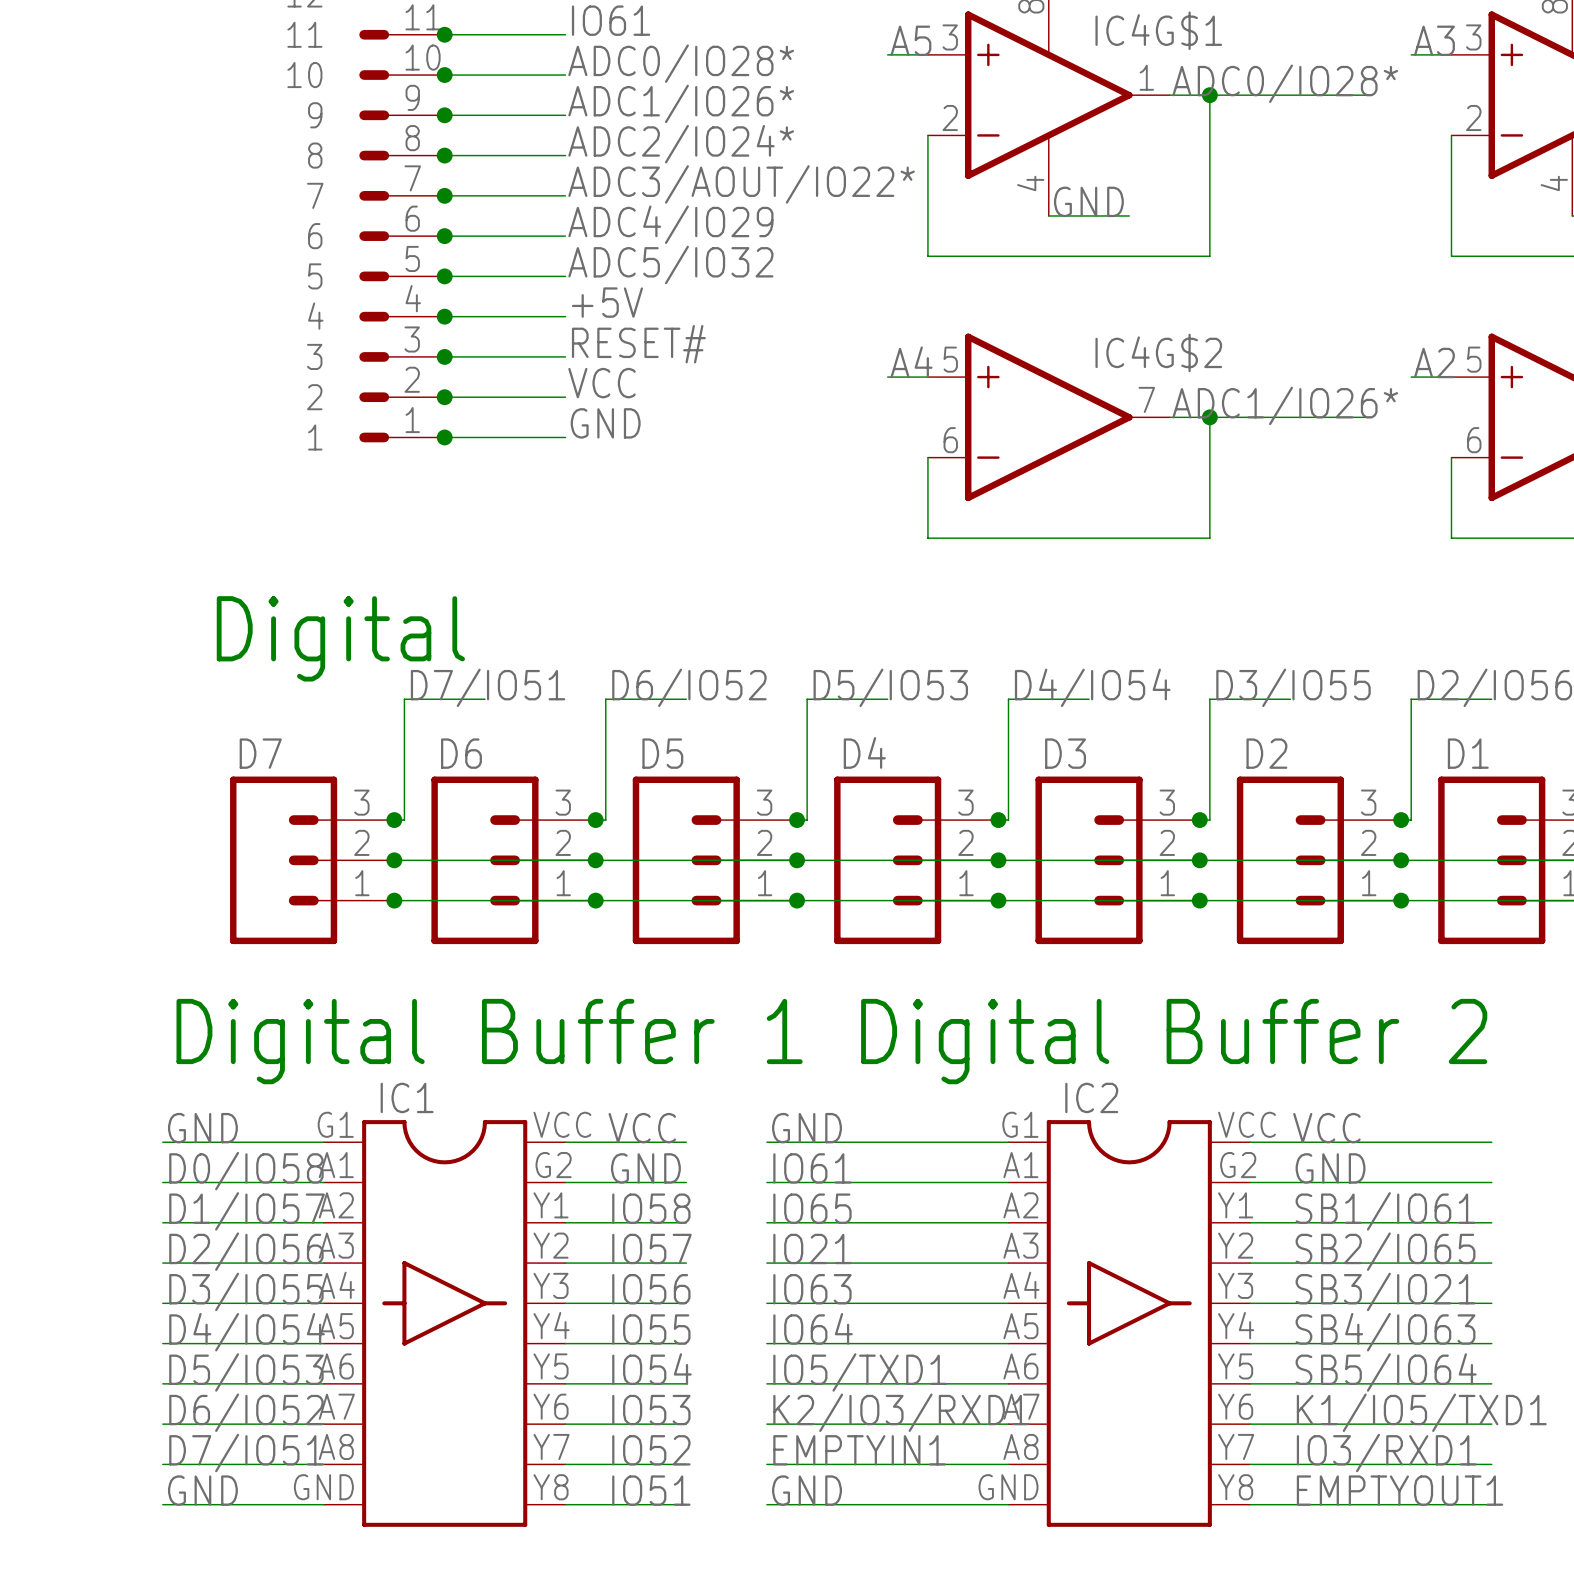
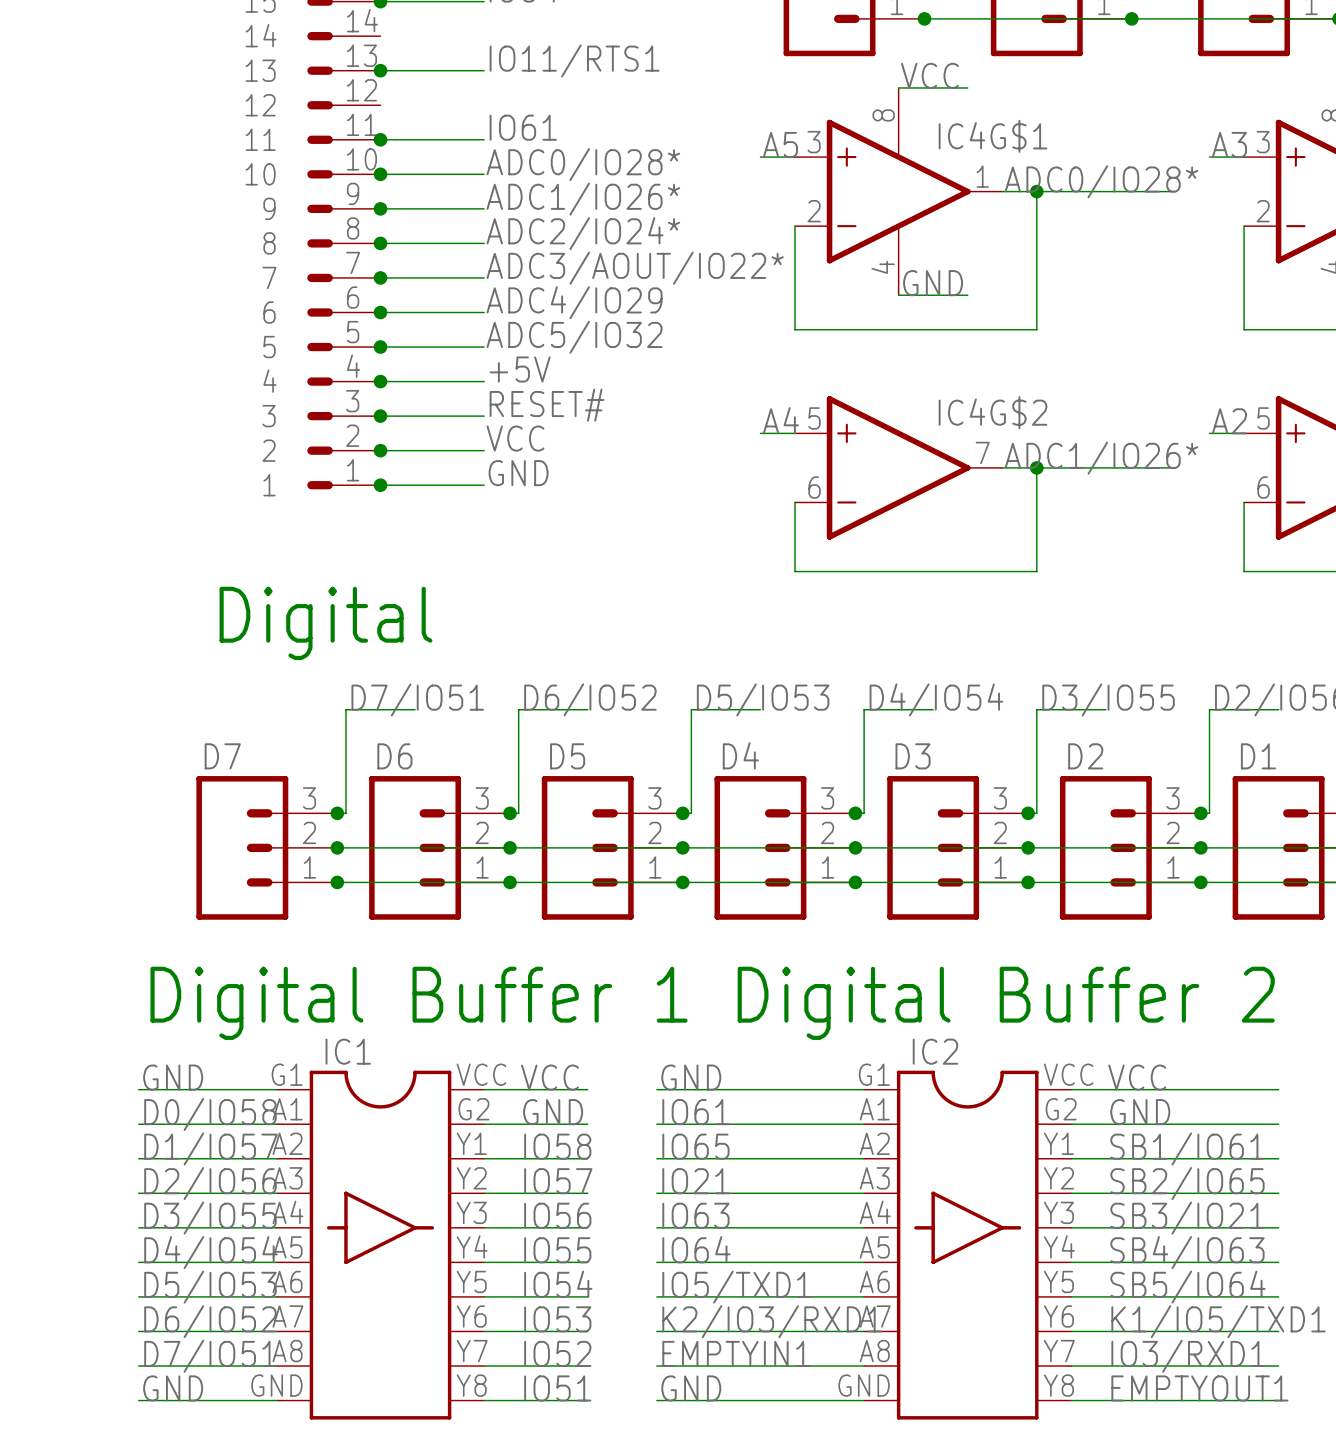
text position: Digital (340, 638) -> Digital (326, 623)

